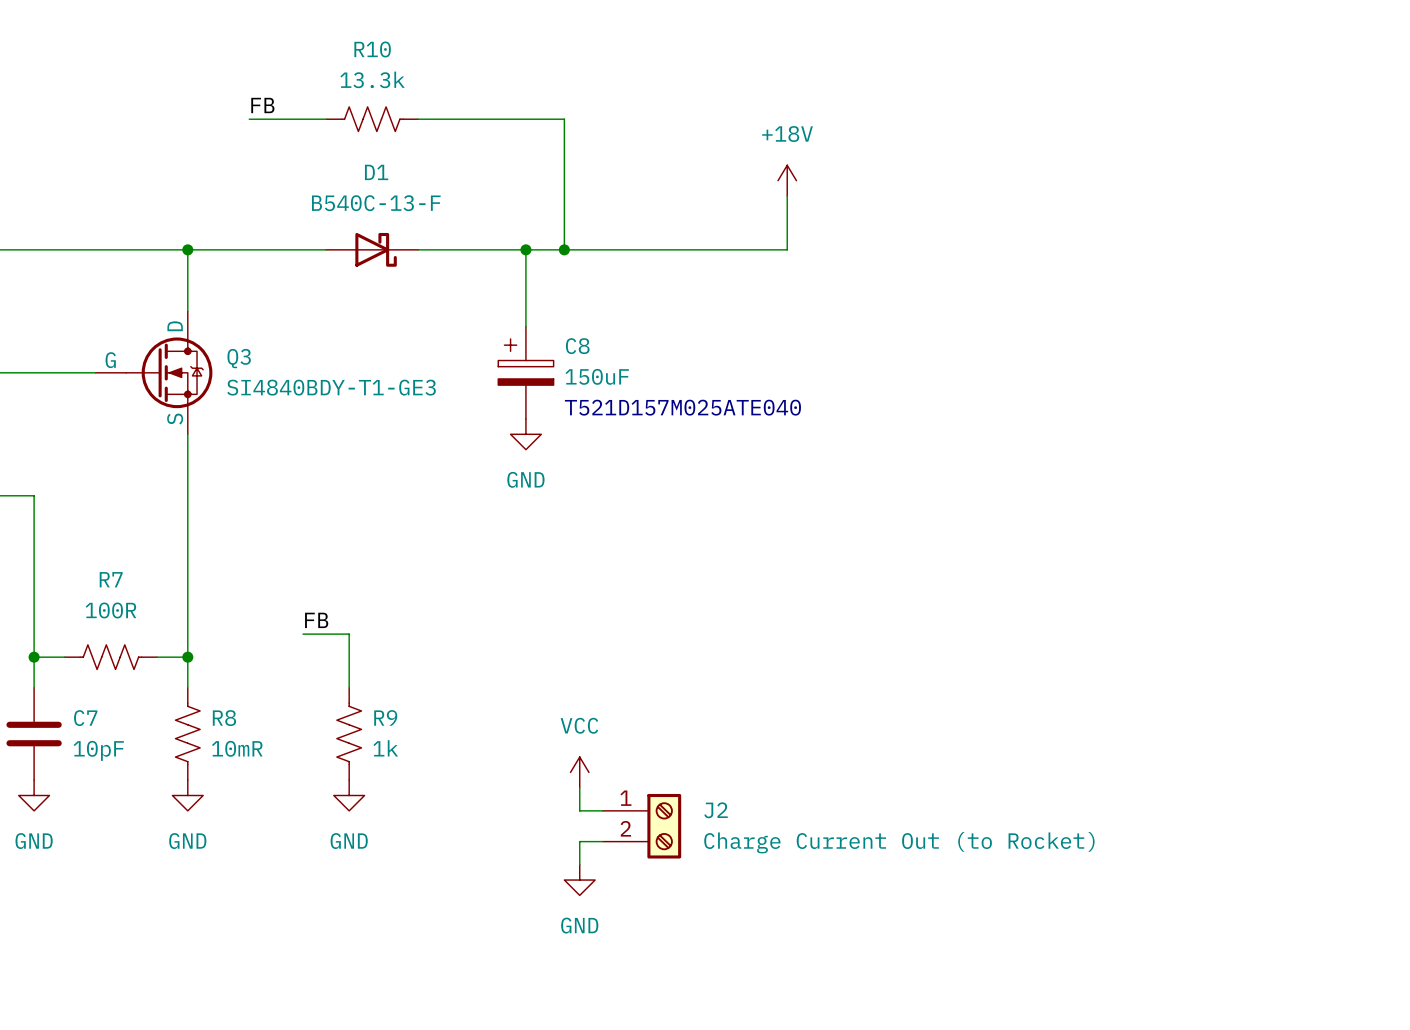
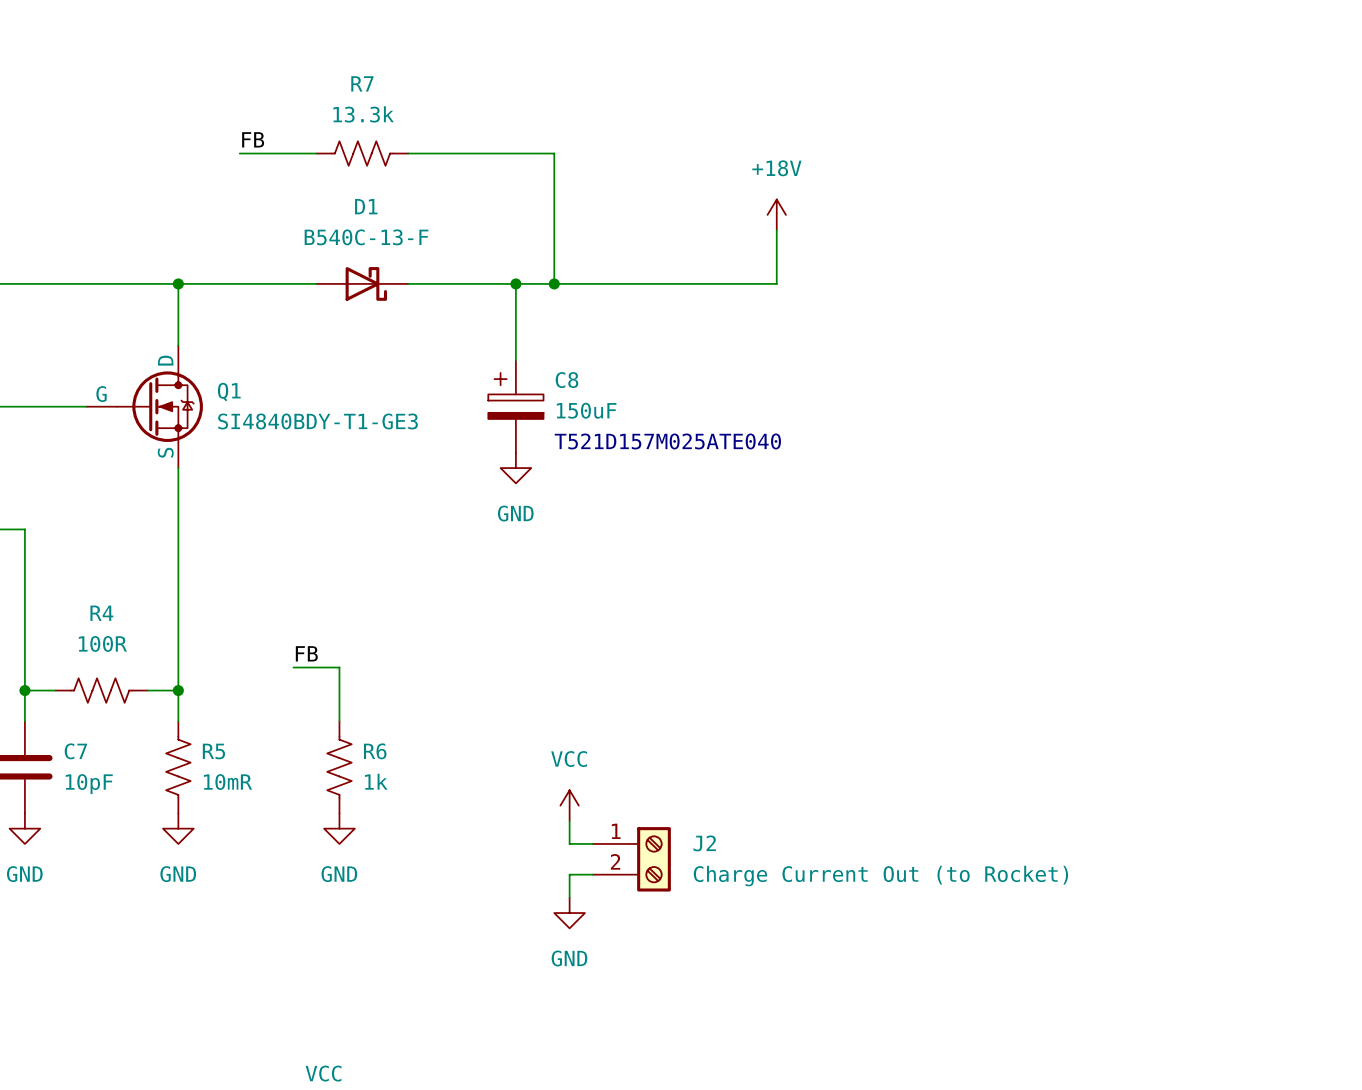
R10 name: R10 (372, 49) -> R7 (362, 83)
Q3 name: Q3 (239, 358) -> Q1 (229, 392)
R7 name: R7 (111, 579) -> R4 (101, 613)
R9 name: R9 (385, 717) -> R6 (375, 751)
R8 name: R8 (224, 718) -> R5 (213, 751)

